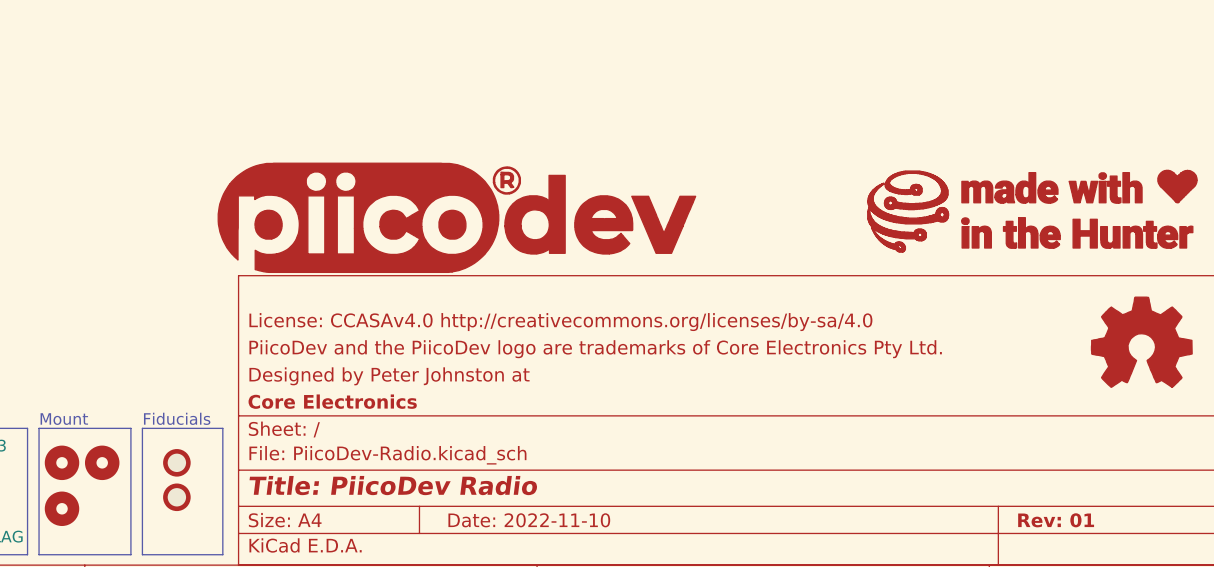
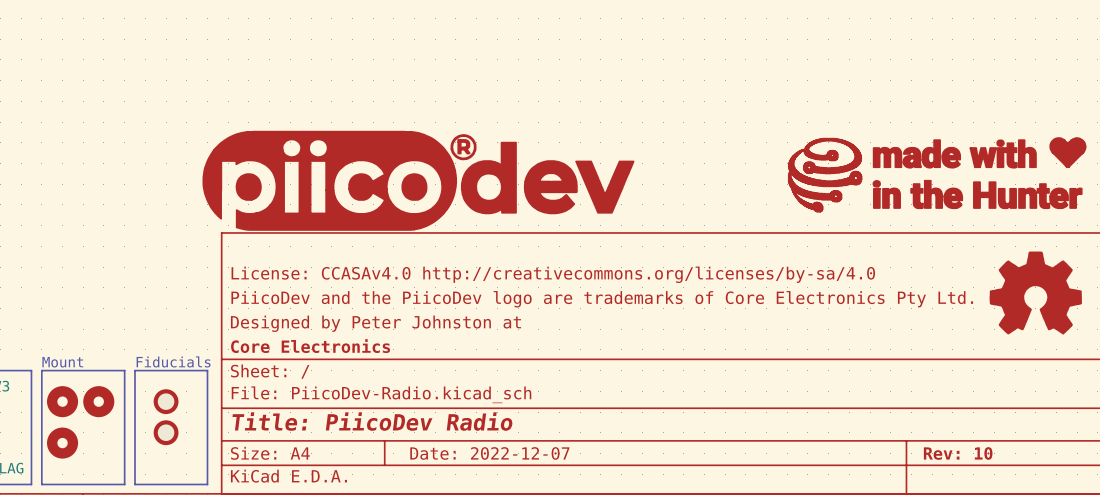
title block: Date: 2022-11-10 (529, 520) -> Date: 2022-12-07 (489, 453)
title block: Rev: 01 (1056, 520) -> Rev: 10 (958, 453)

